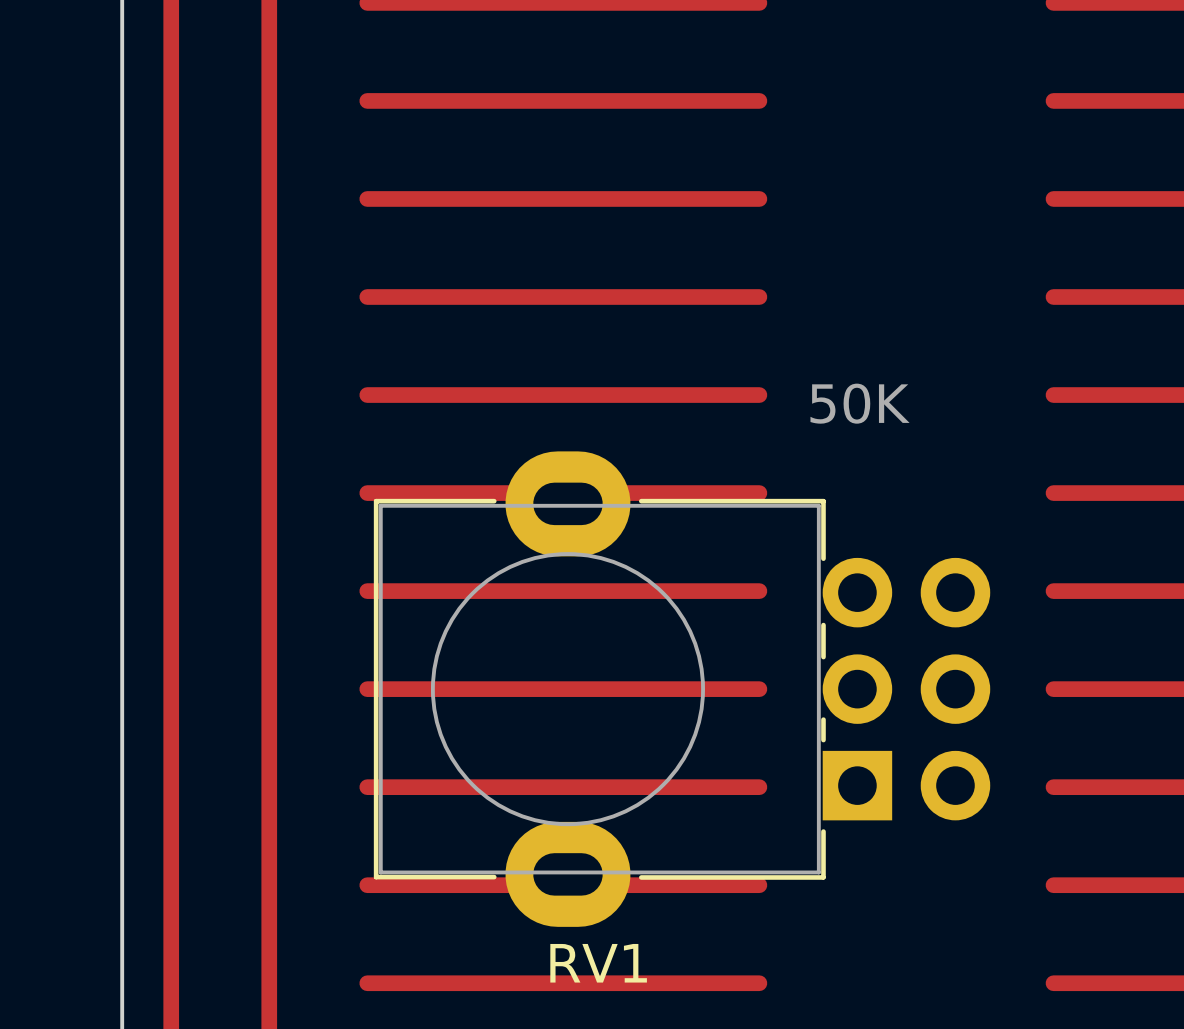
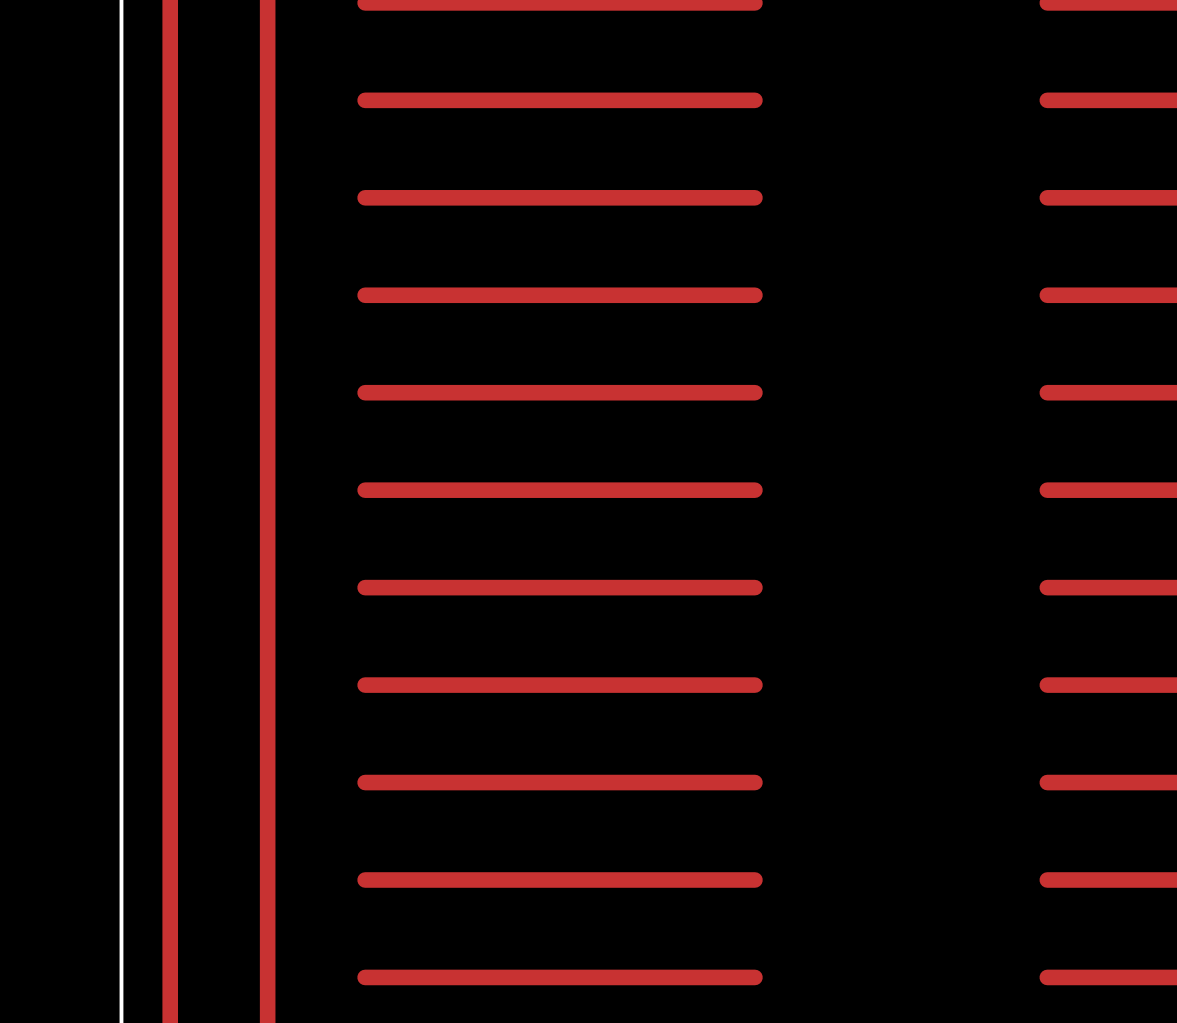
RV1: 50K (682, 689) -> none

